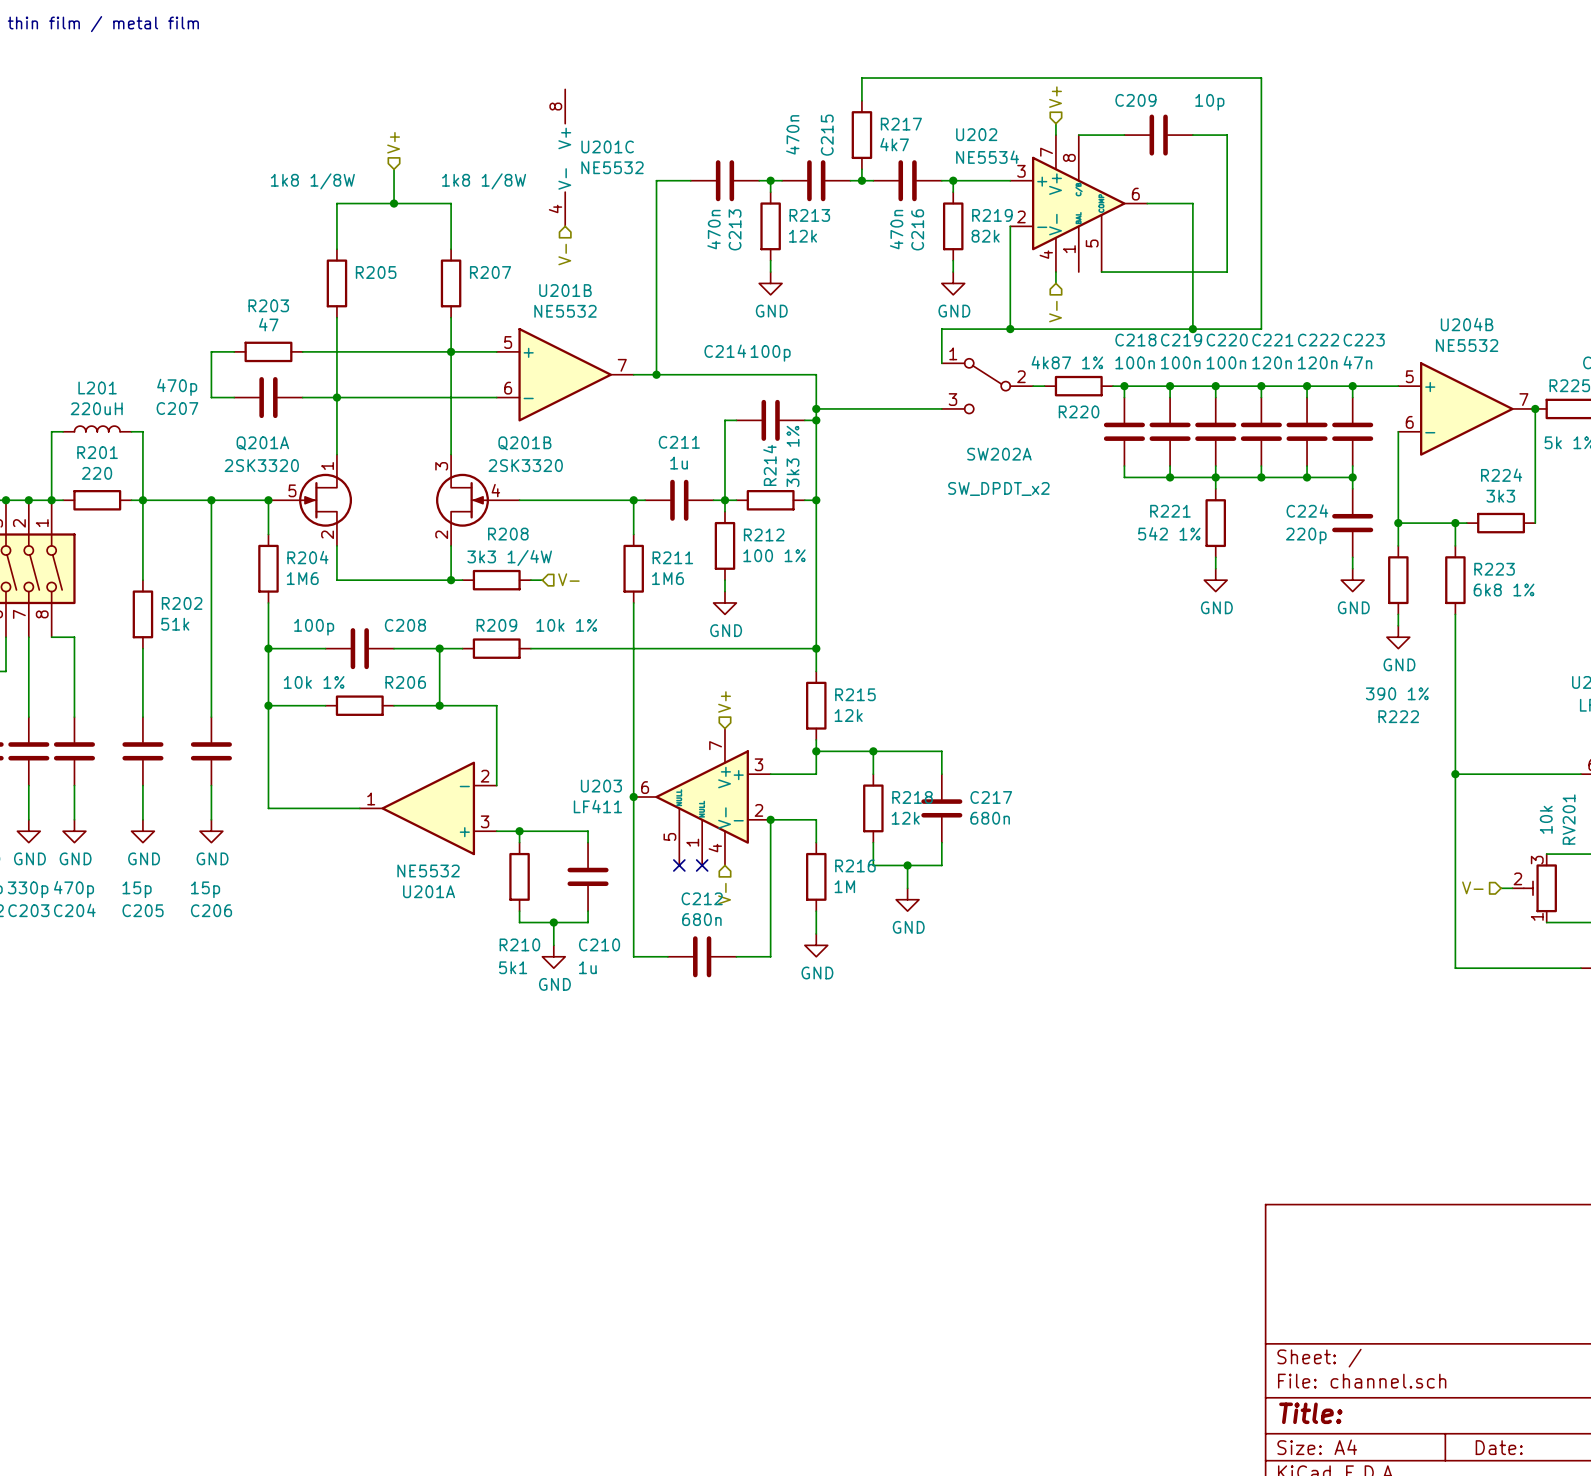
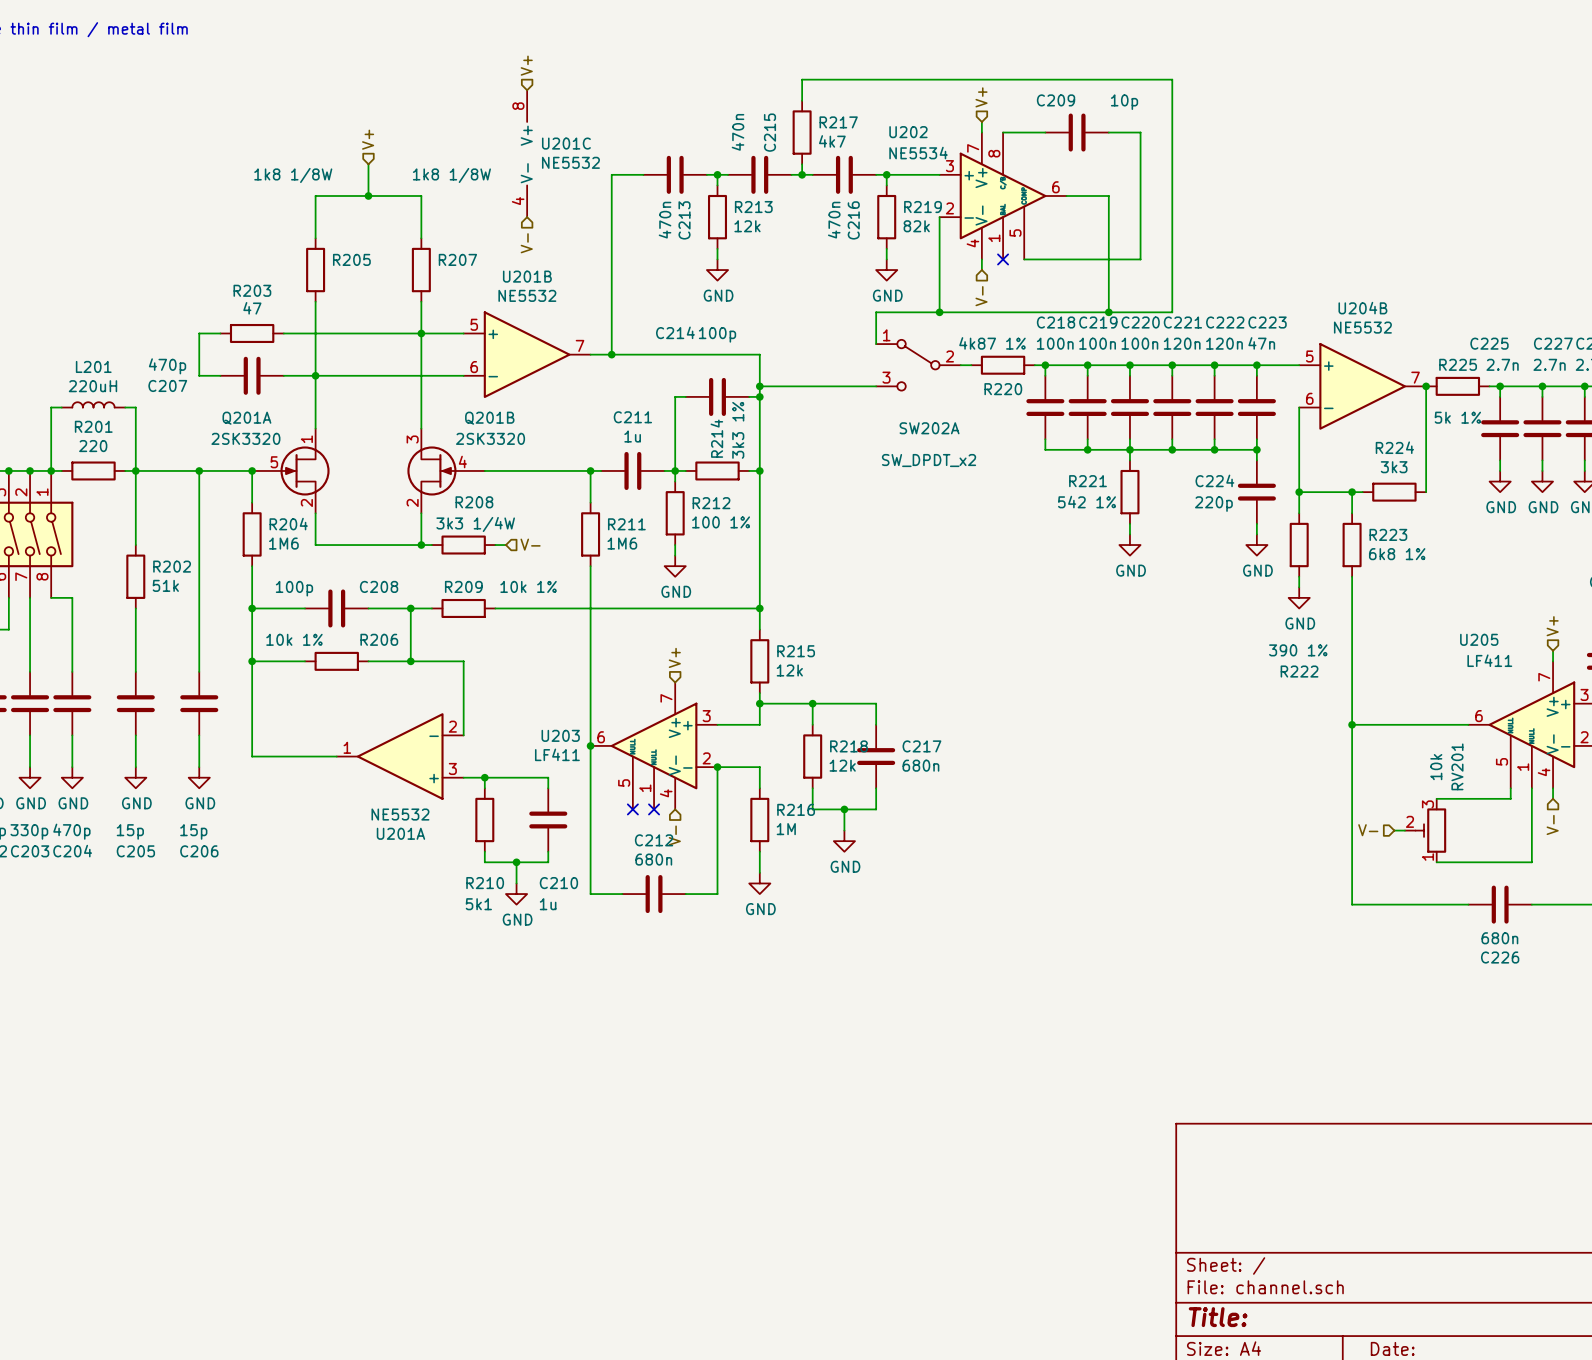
hierarchical label: none -> V+ (526, 65)
no-connect mark: none -> (1003, 259)

